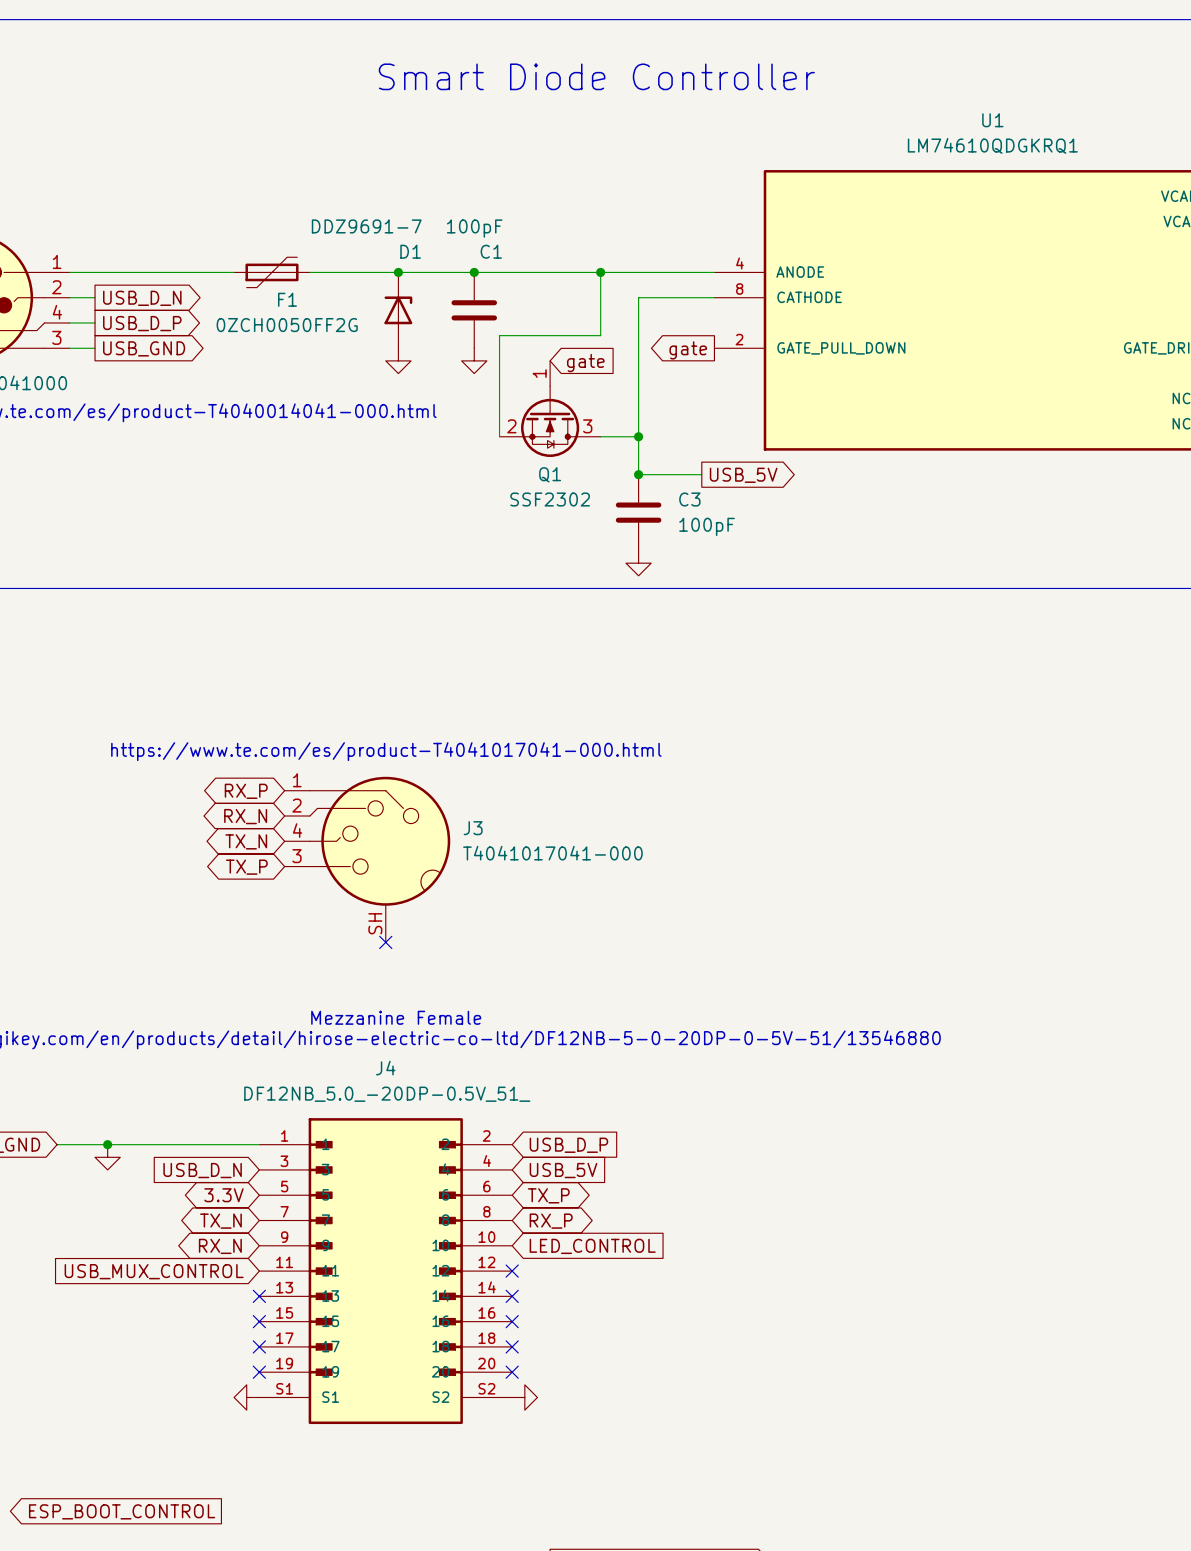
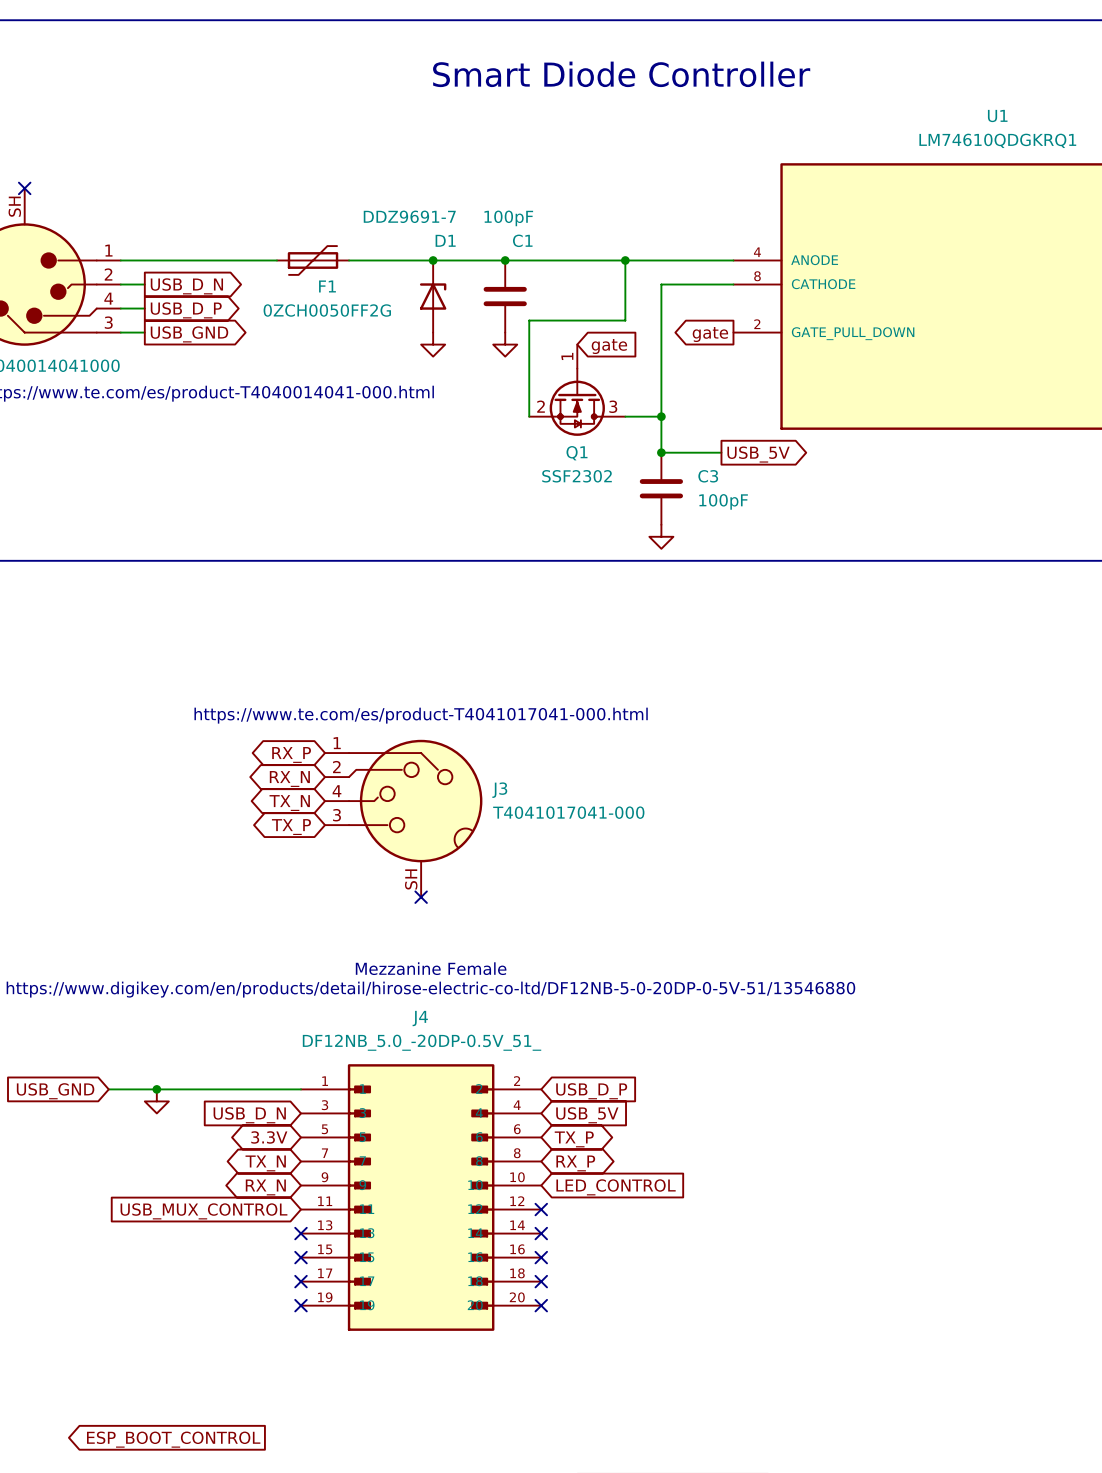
J4 symbol: [259, 1118, 513, 1425] -> [301, 1064, 542, 1331]
power symbol: (246, 1397) -> none
power symbol: (524, 1397) -> none

